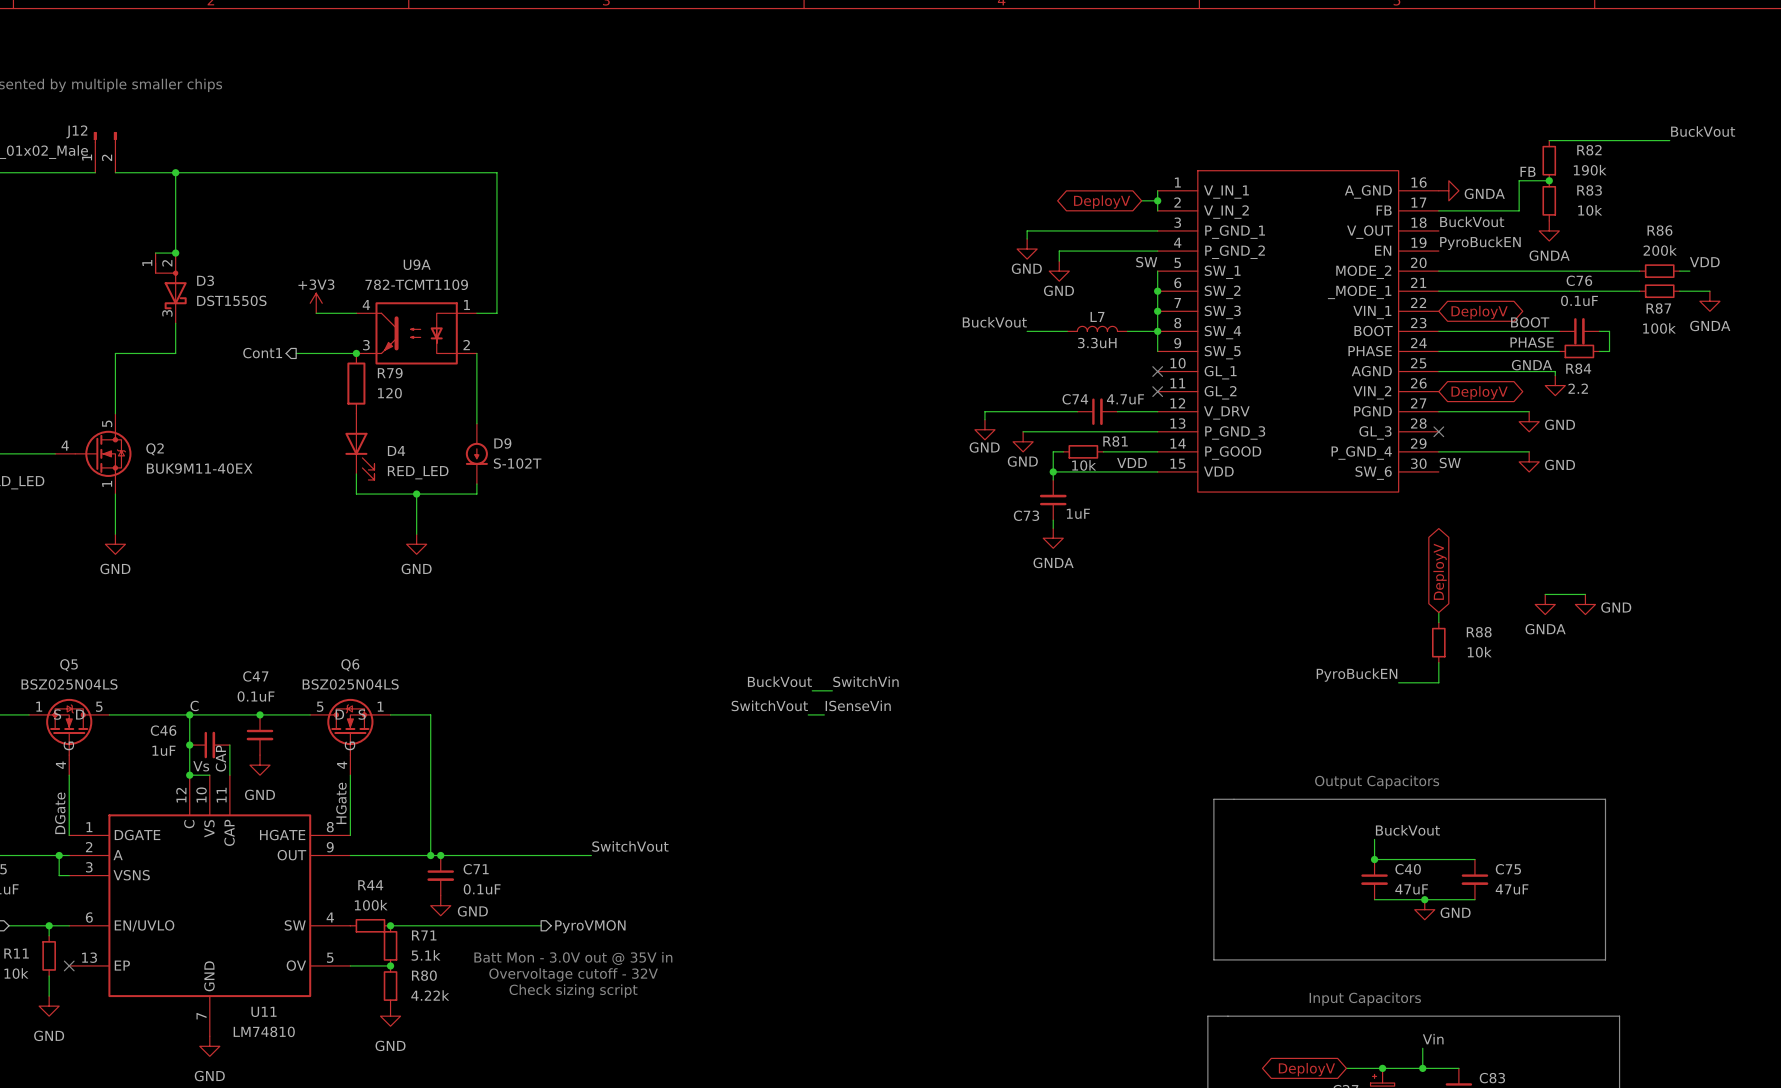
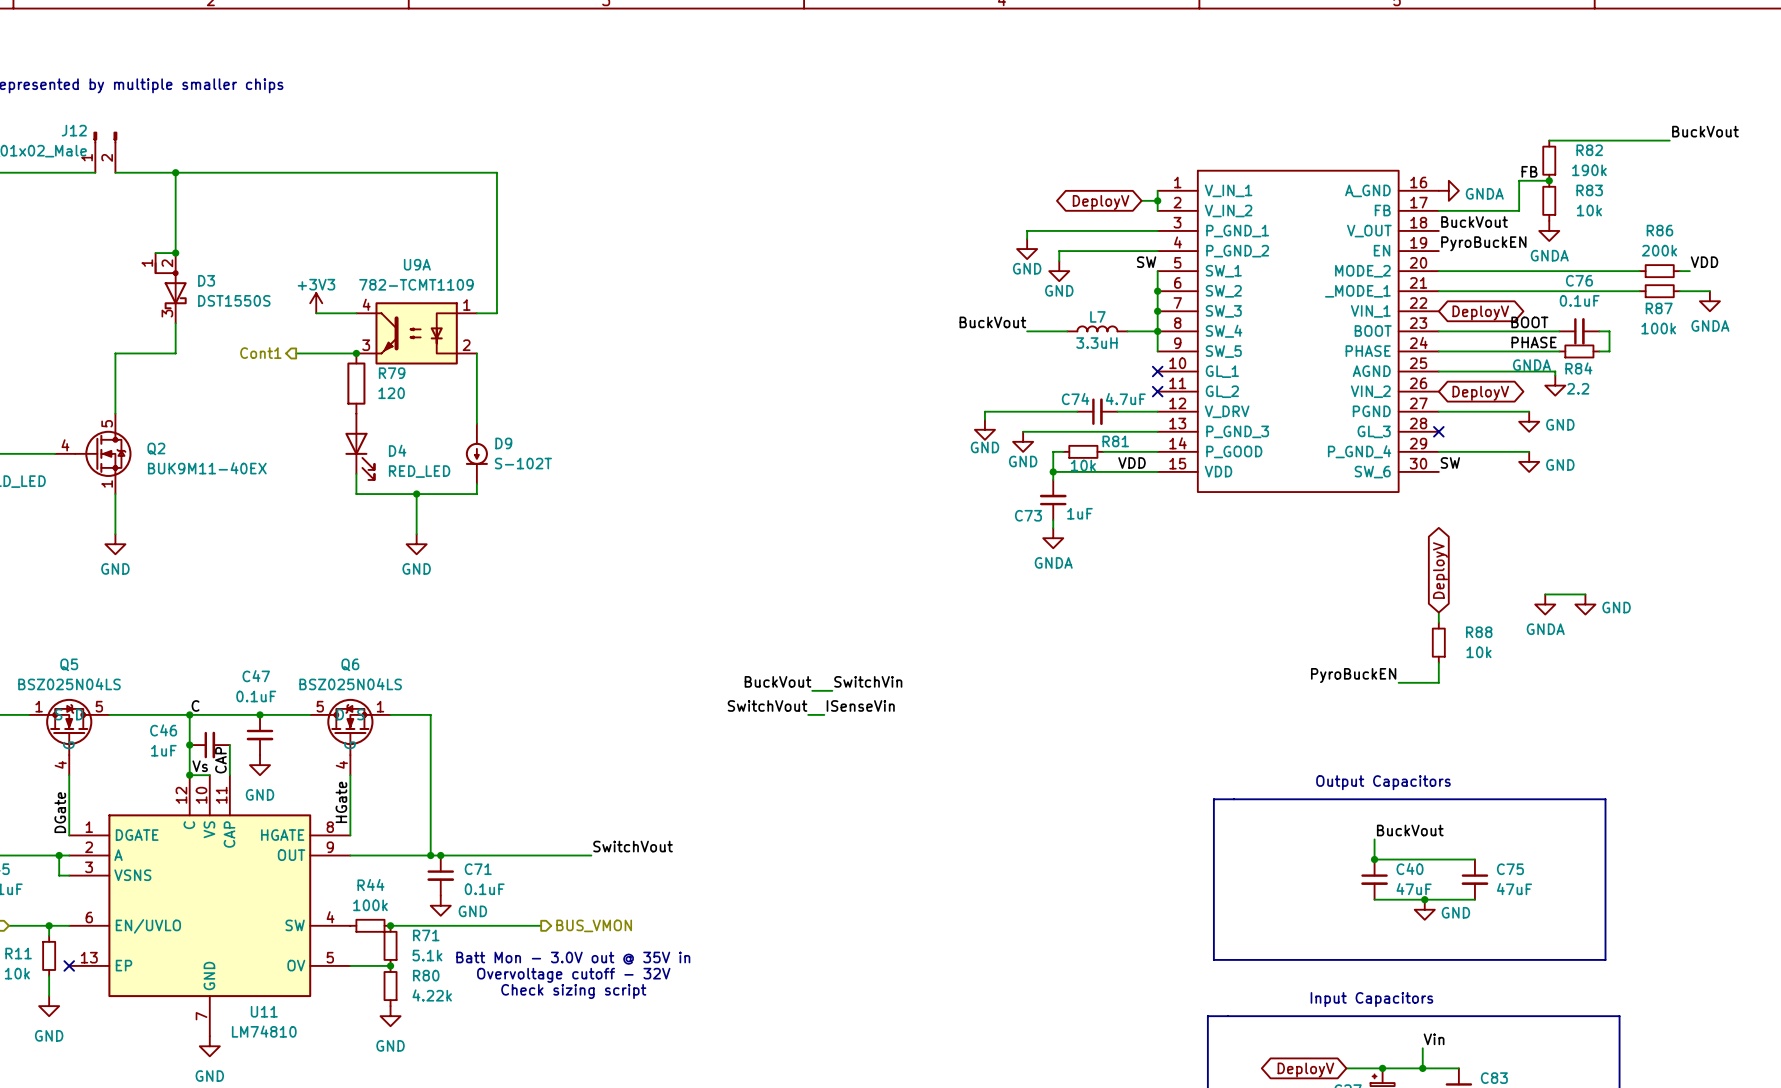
hierarchical label: PyroVMON (590, 926) -> BUS_VMON (594, 925)

